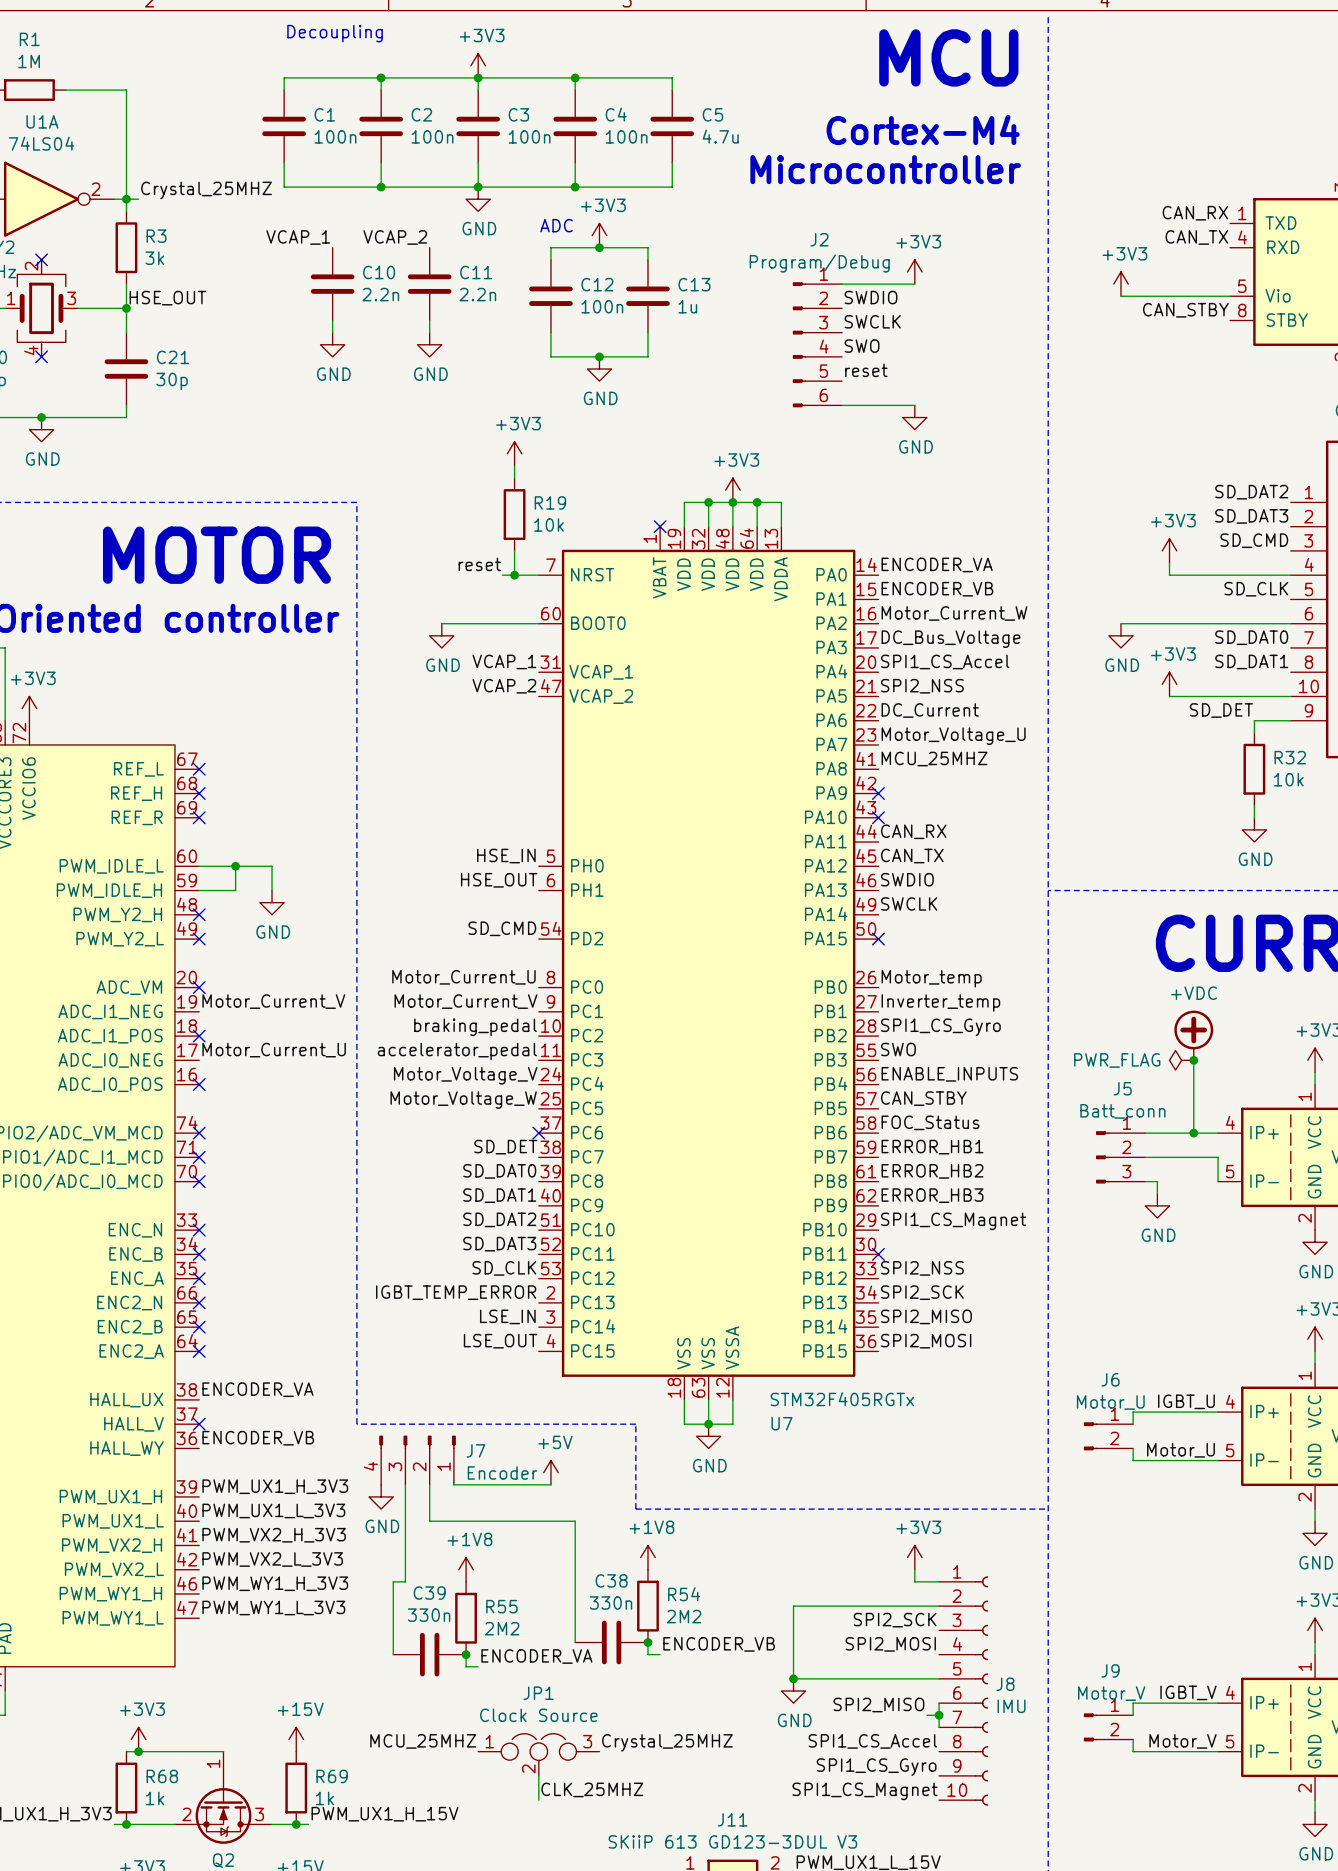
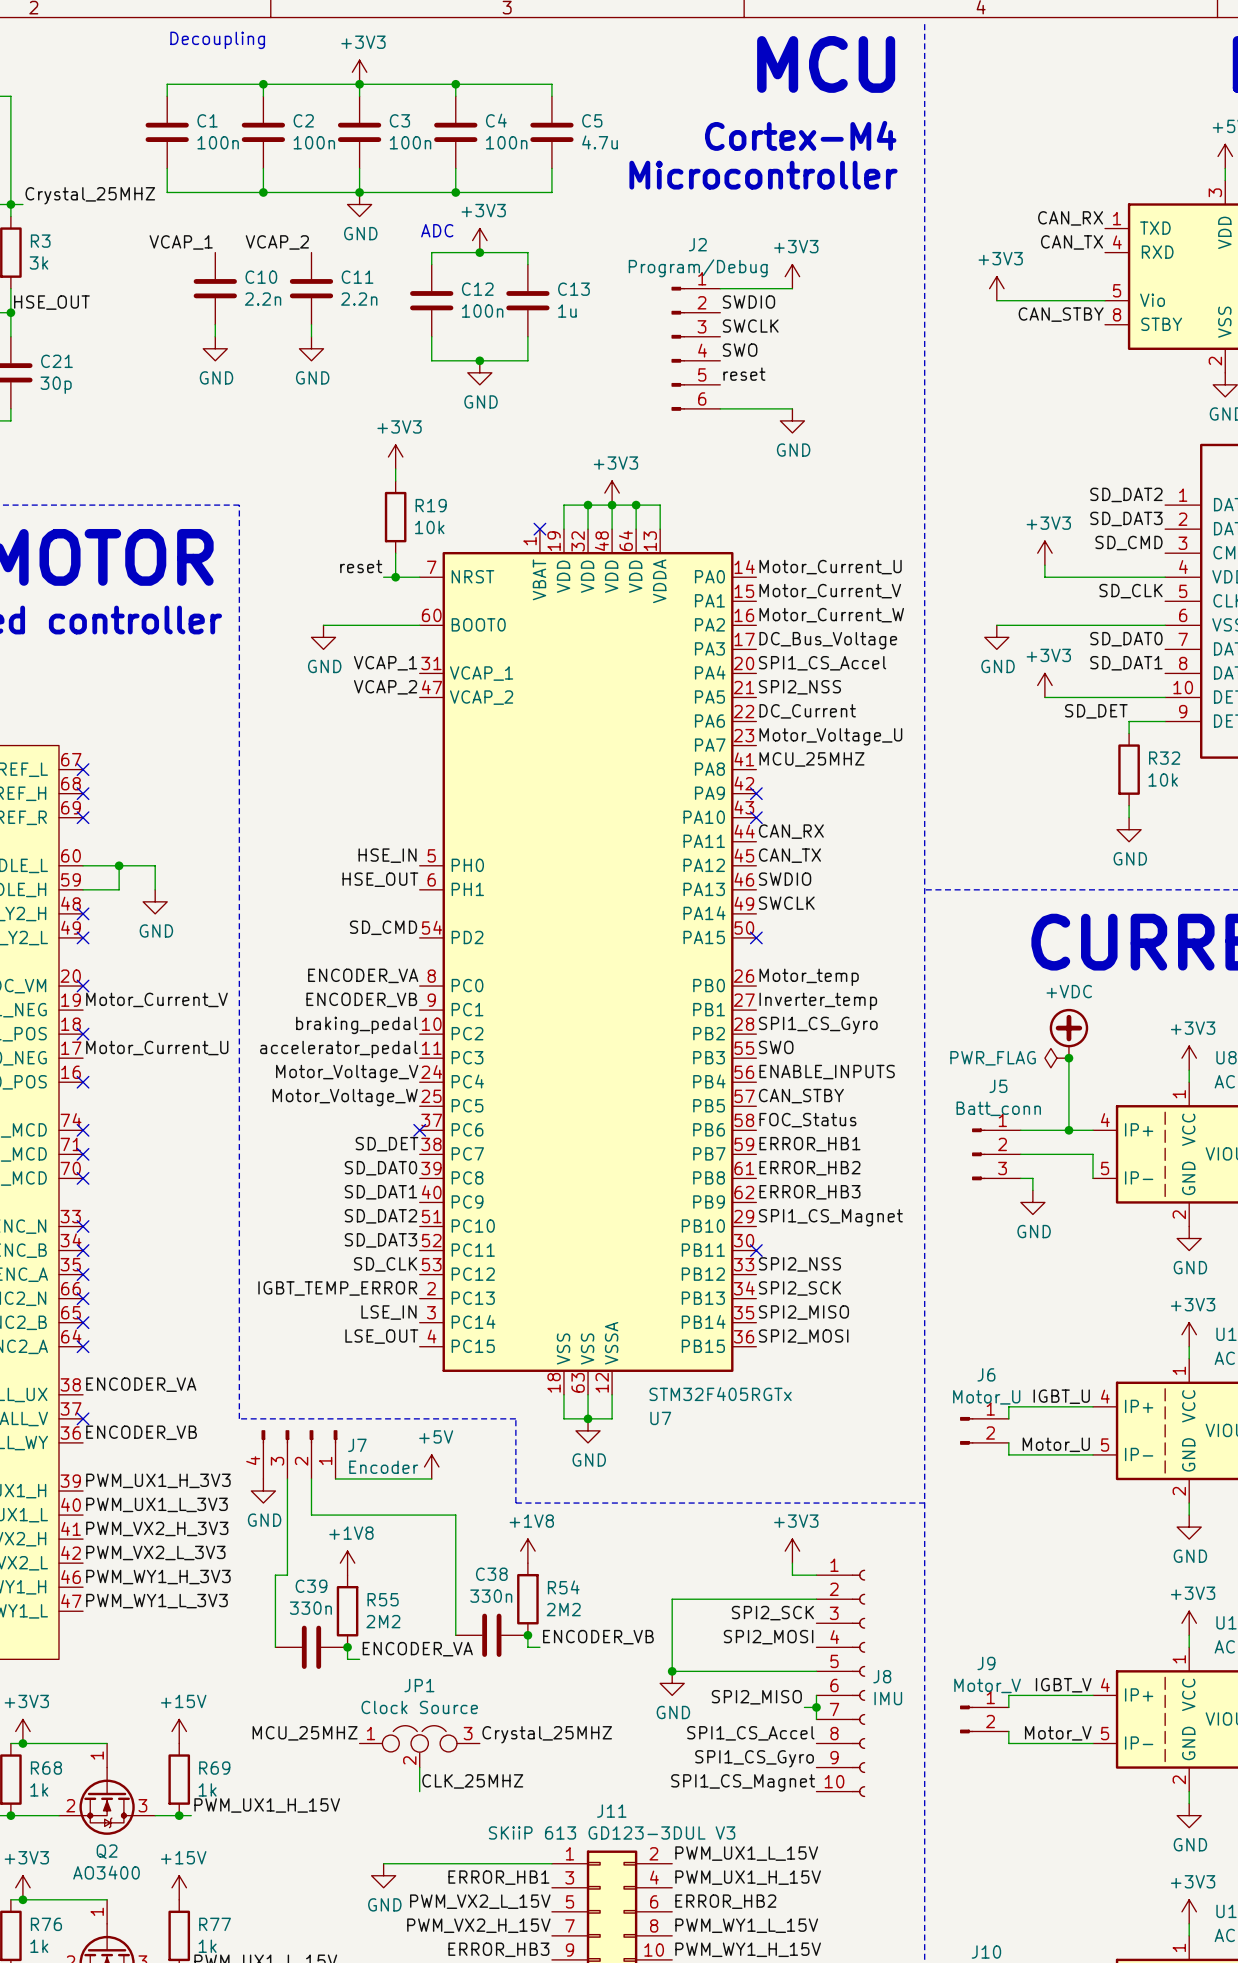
label: ENCODER_VA (937, 564) -> Motor_Current_U (830, 567)
label: ENCODER_VB (937, 589) -> Motor_Current_V (830, 591)
label: Motor_Current_U (463, 977) -> ENCODER_VA (363, 975)
label: Motor_Current_V (465, 1001) -> ENCODER_VB (361, 999)

